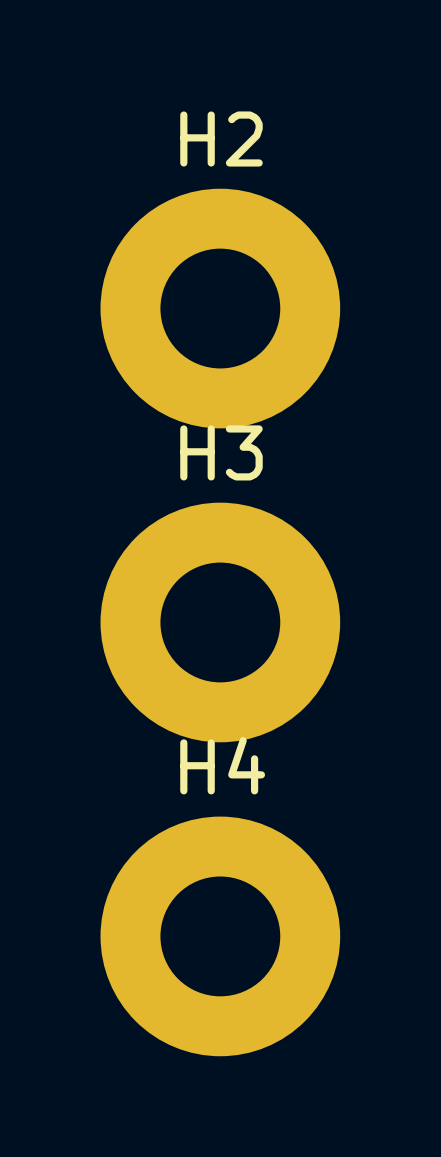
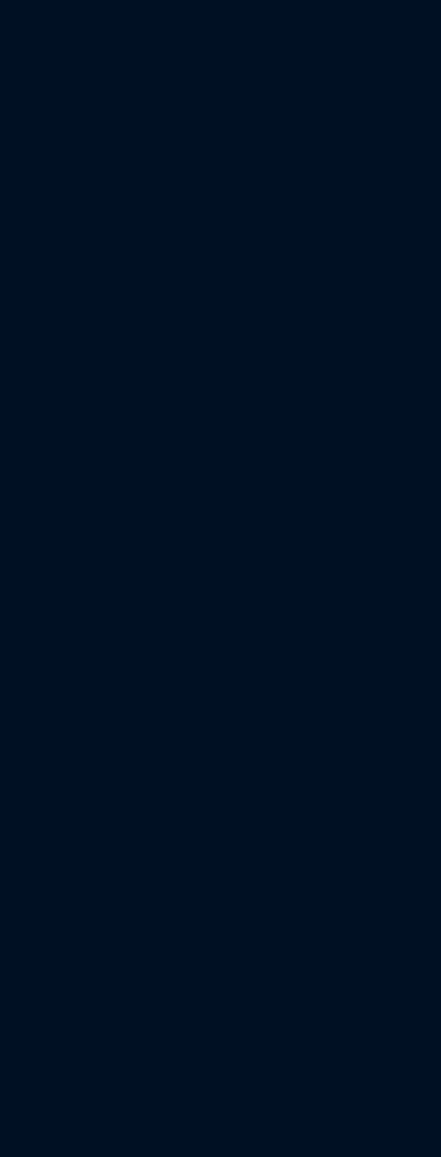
H2: (220, 308) -> none
H3: (220, 622) -> none
H4: (220, 936) -> none

